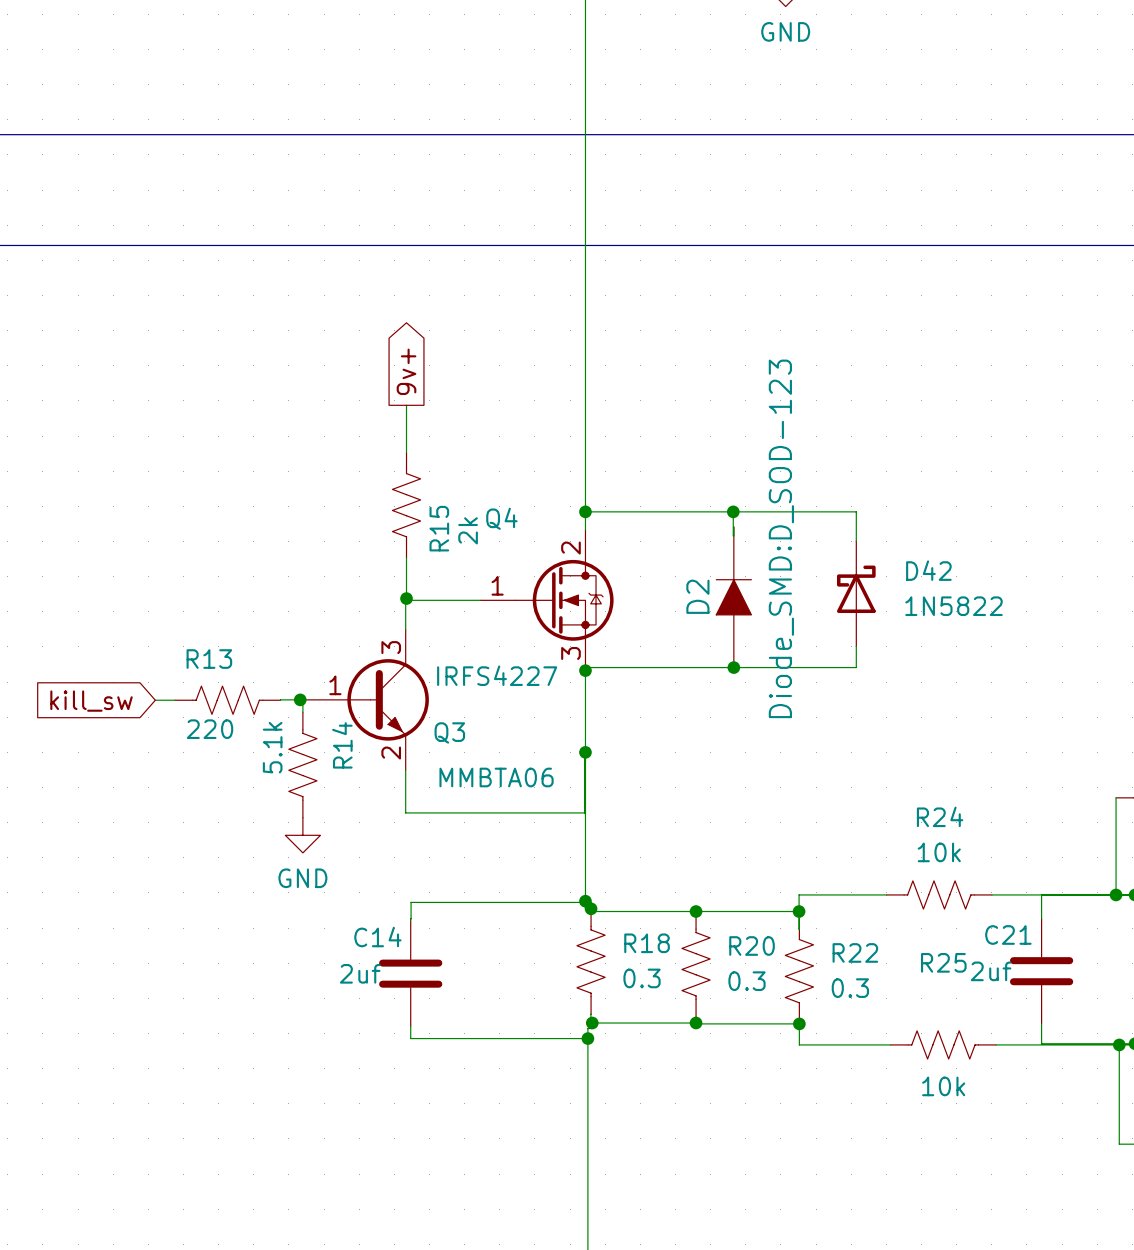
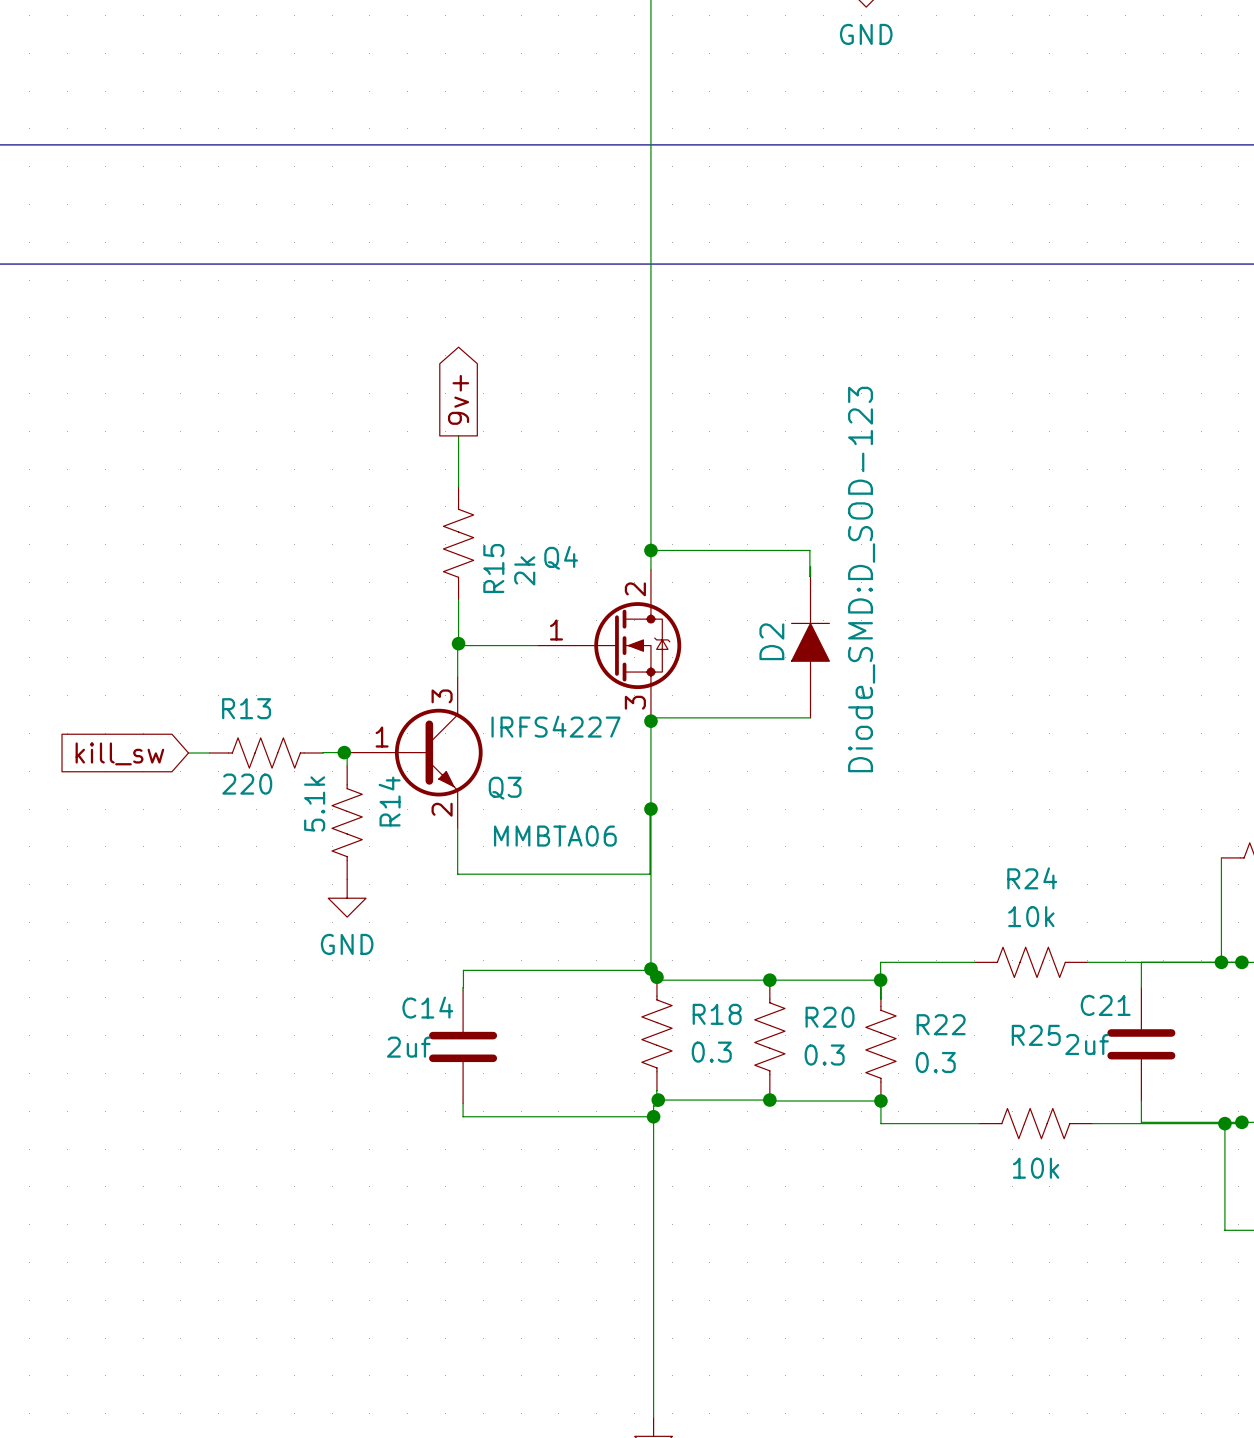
wire: (733, 511) (856, 511) (856, 540) -> none
junction: (733, 511) -> none
D42: 1N5822 (856, 593) -> none
wire: (856, 646) (856, 667) (733, 667) -> none
junction: (733, 667) -> none

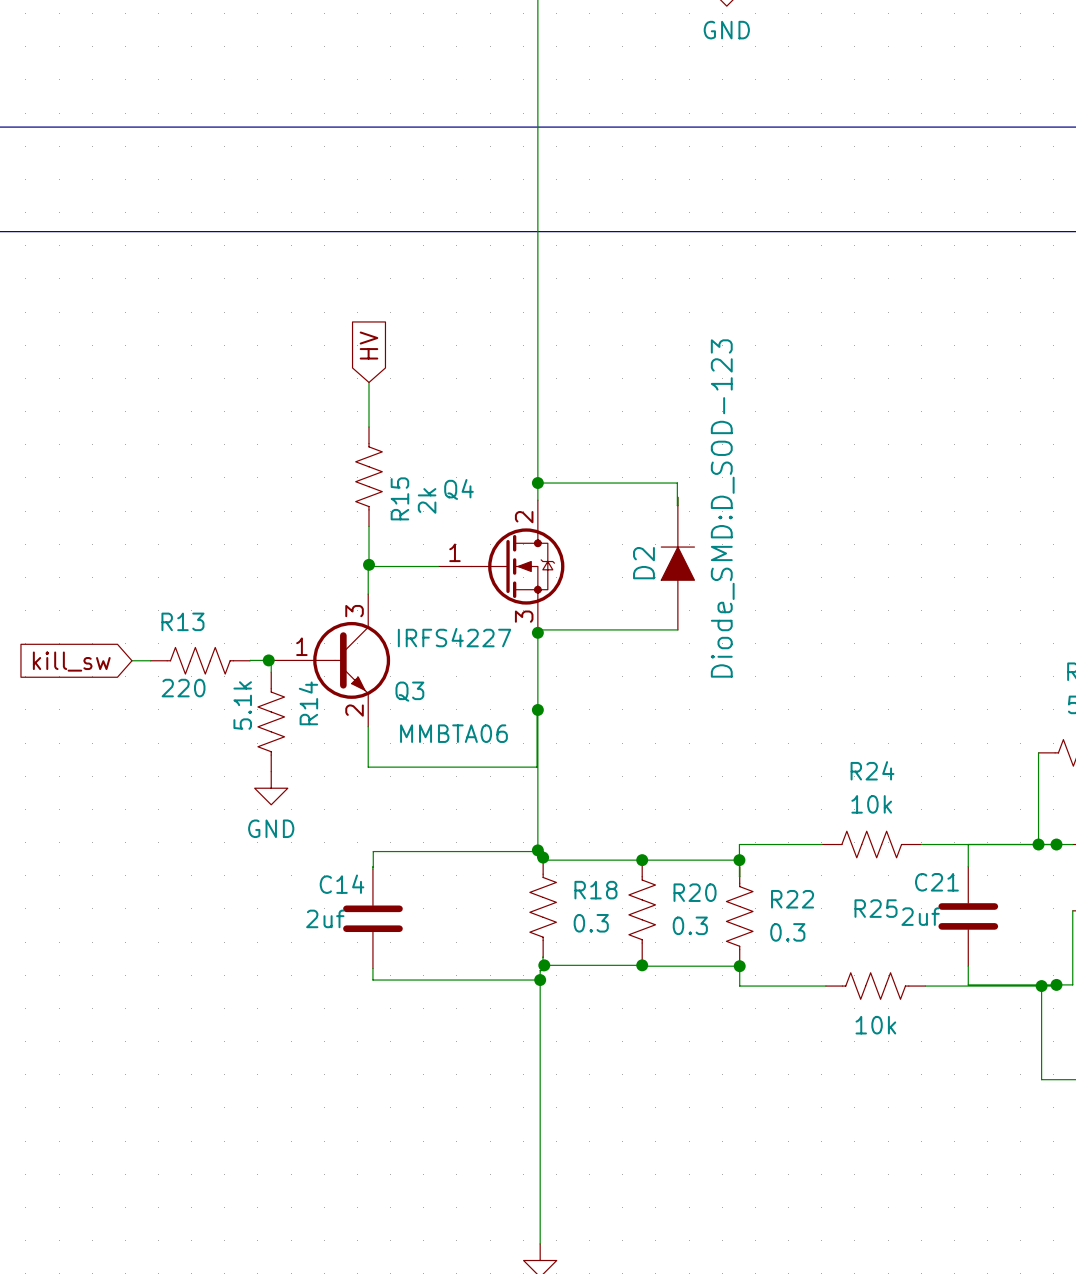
global label shape: output (458, 399) -> input (369, 345)
global label: 9v+ (458, 399) -> HV (369, 345)

